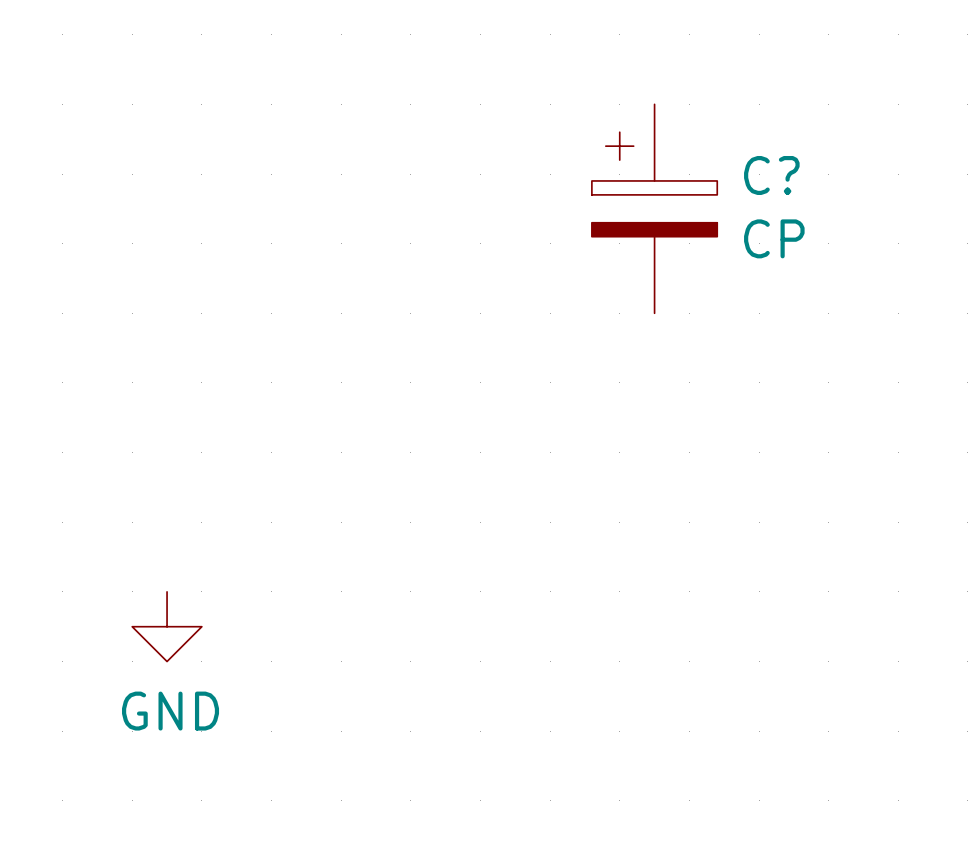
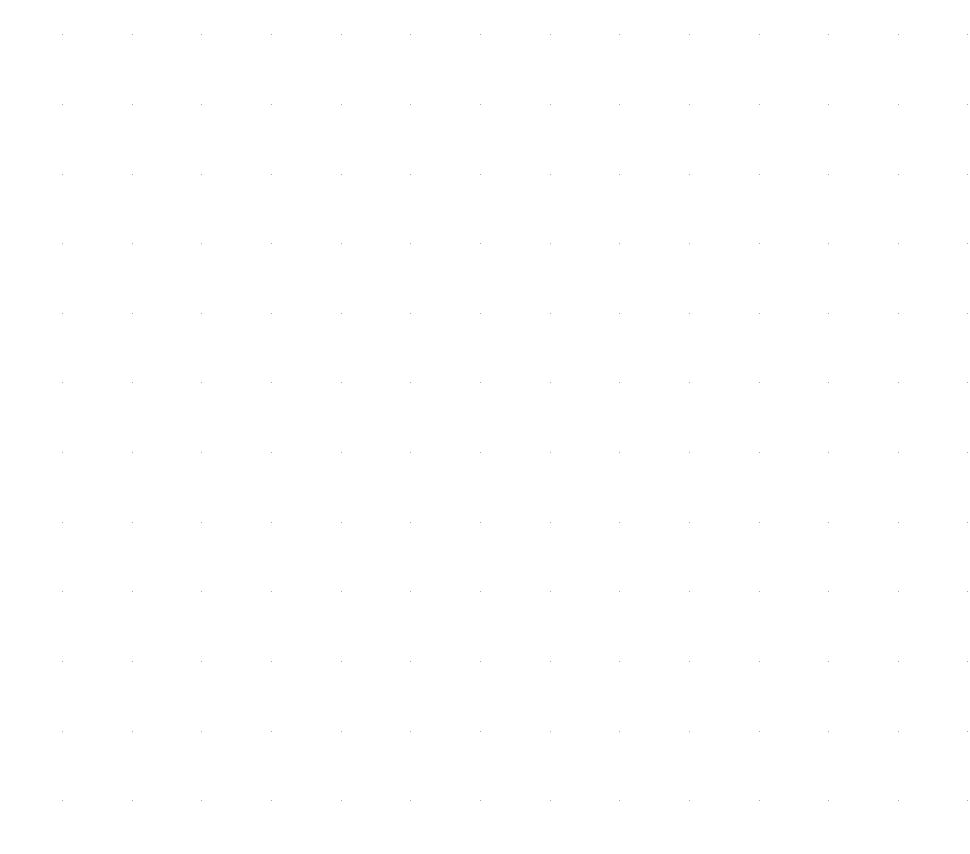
C?: CP (654, 208) -> none
power symbol: GND (167, 626) -> none

